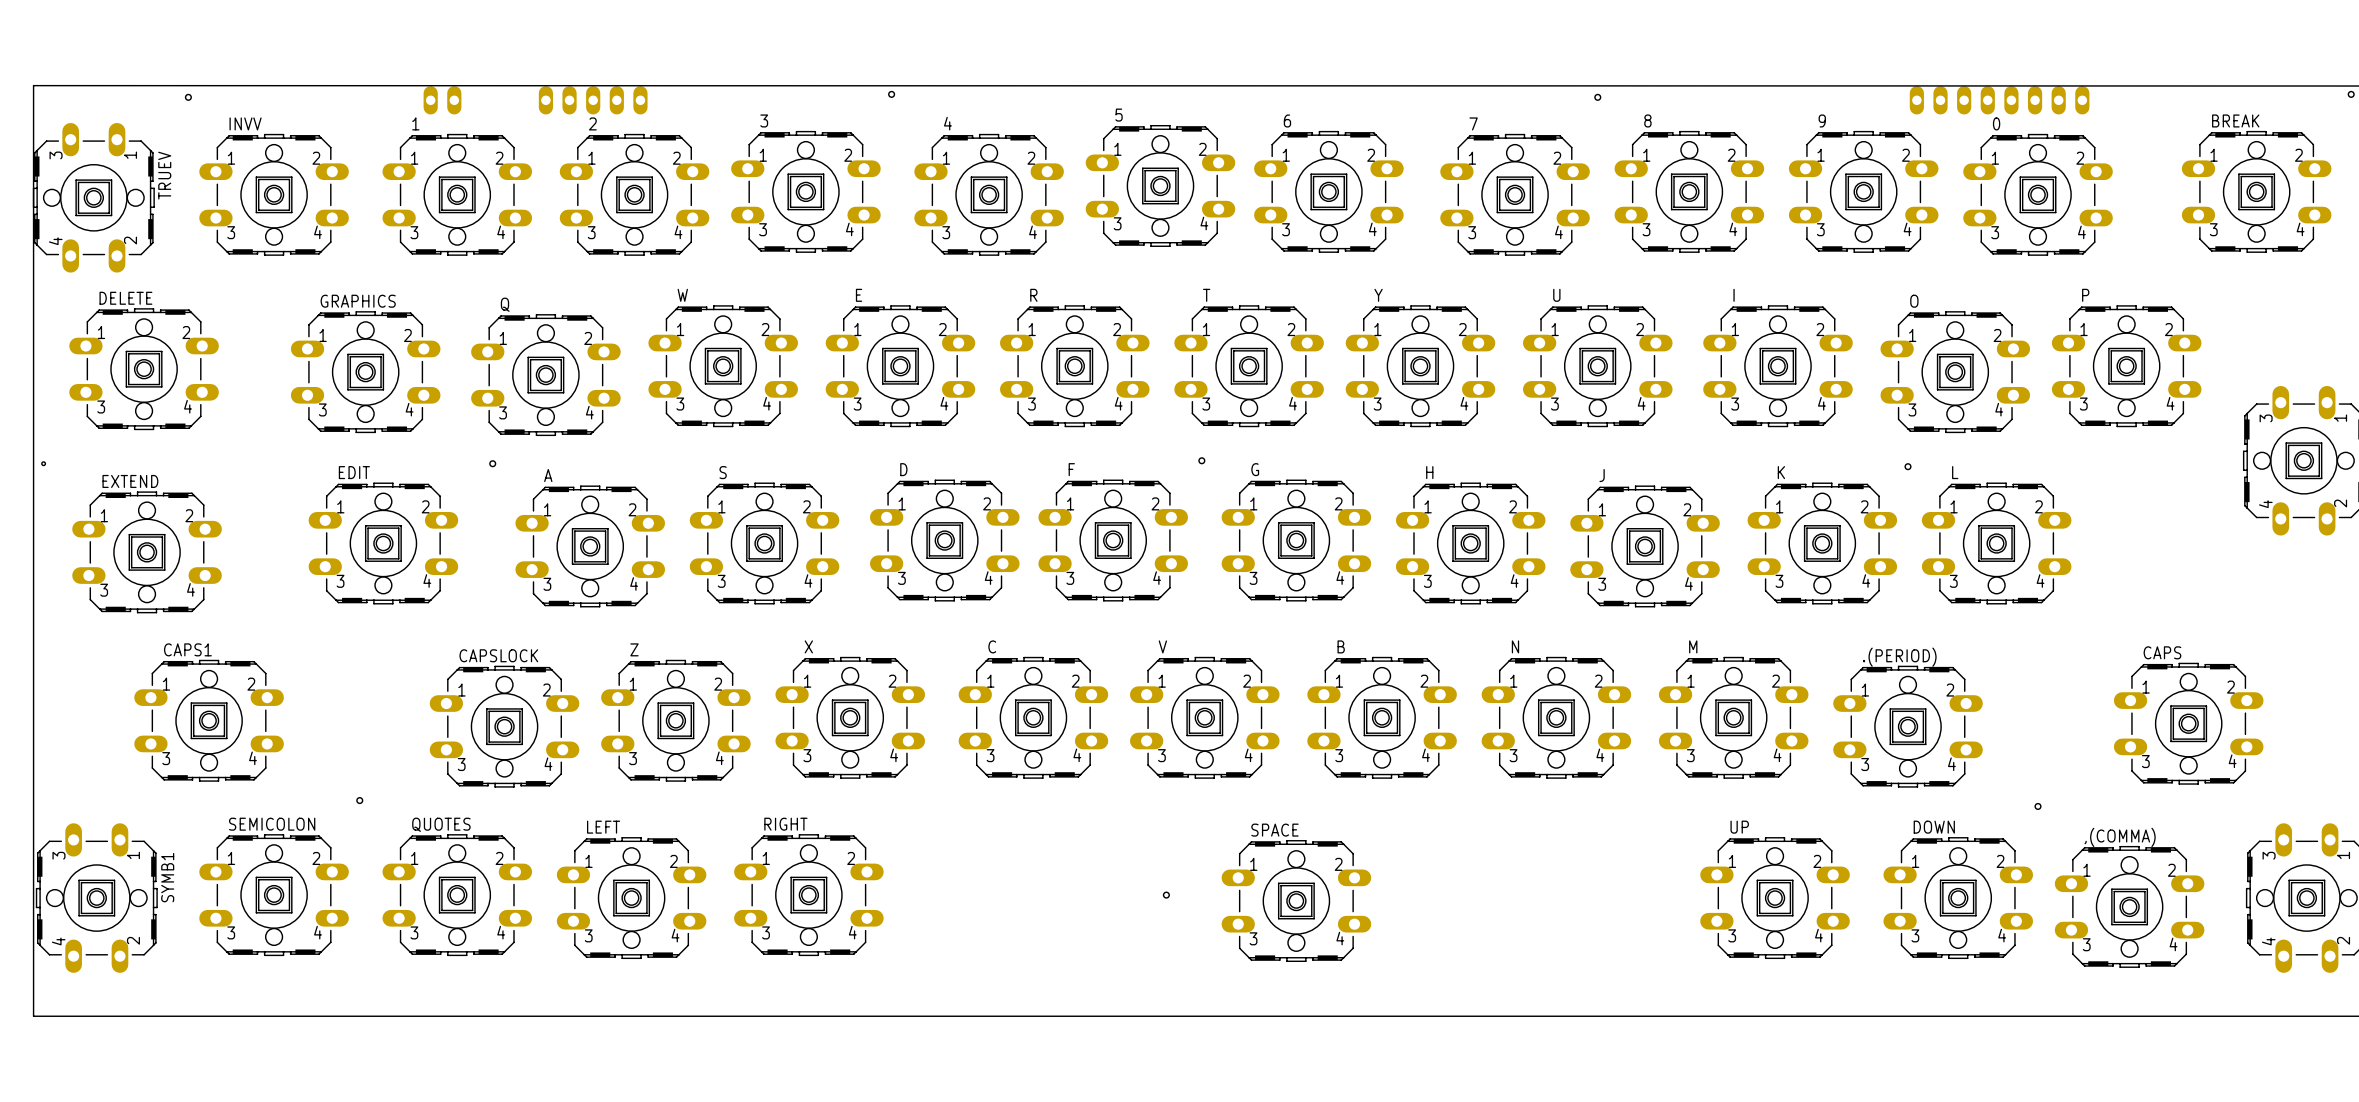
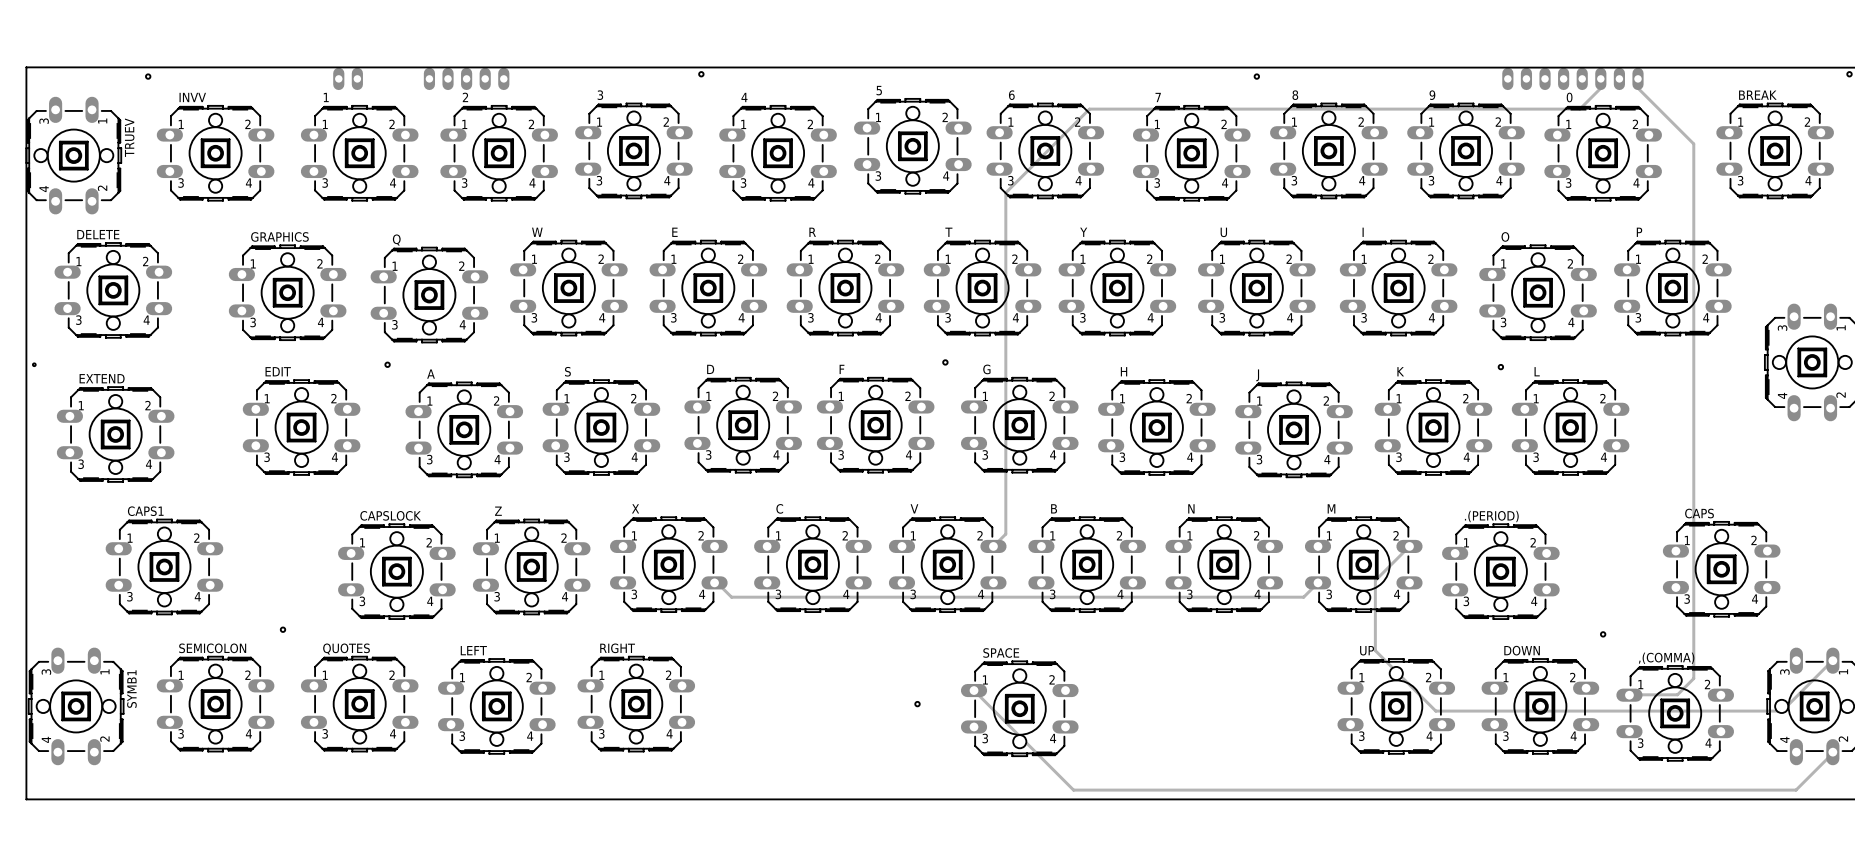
track: none -> (1600, 78) (1600, 88) (1579, 109) (1089, 109) (1005, 192) (1005, 534) (993, 546)
track: none -> (1638, 78) (1638, 88) (1693, 143) (1693, 678) (1677, 694) (1629, 695)
track: none -> (1409, 546) (1375, 580) (1375, 650) (1435, 711) (1782, 711) (1832, 660)
track: none -> (1318, 582) (1303, 597) (731, 597) (717, 582) (714, 582)
track: none -> (974, 690) (1073, 790) (1796, 790) (1832, 752)

